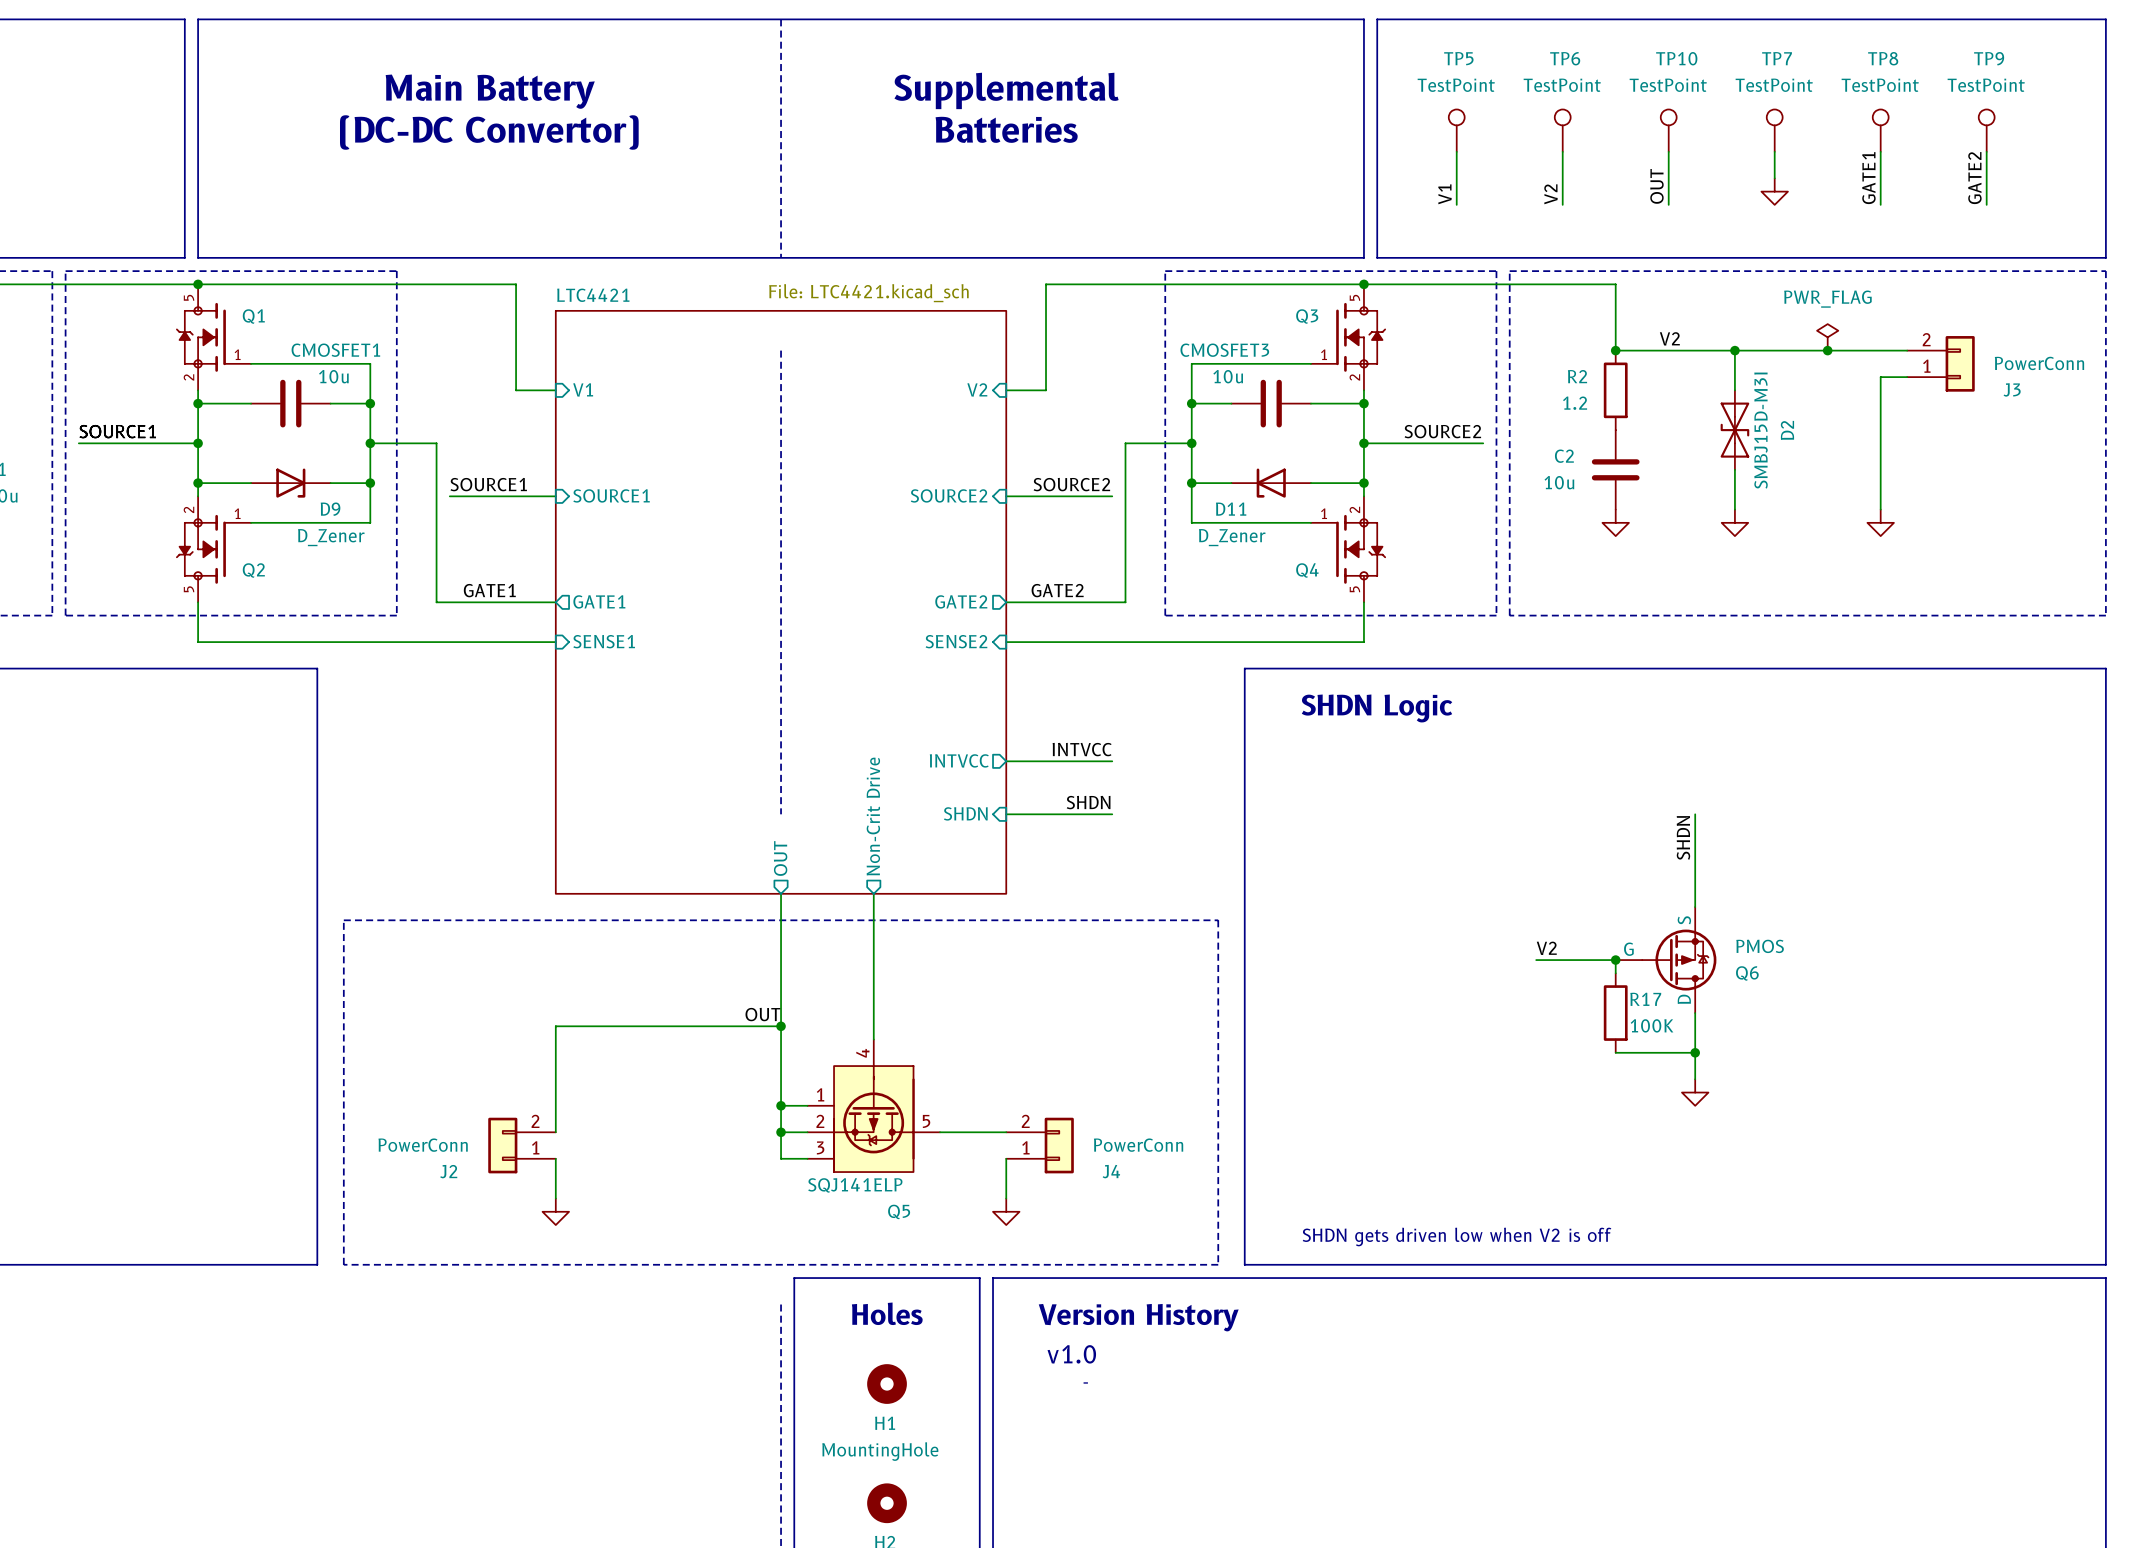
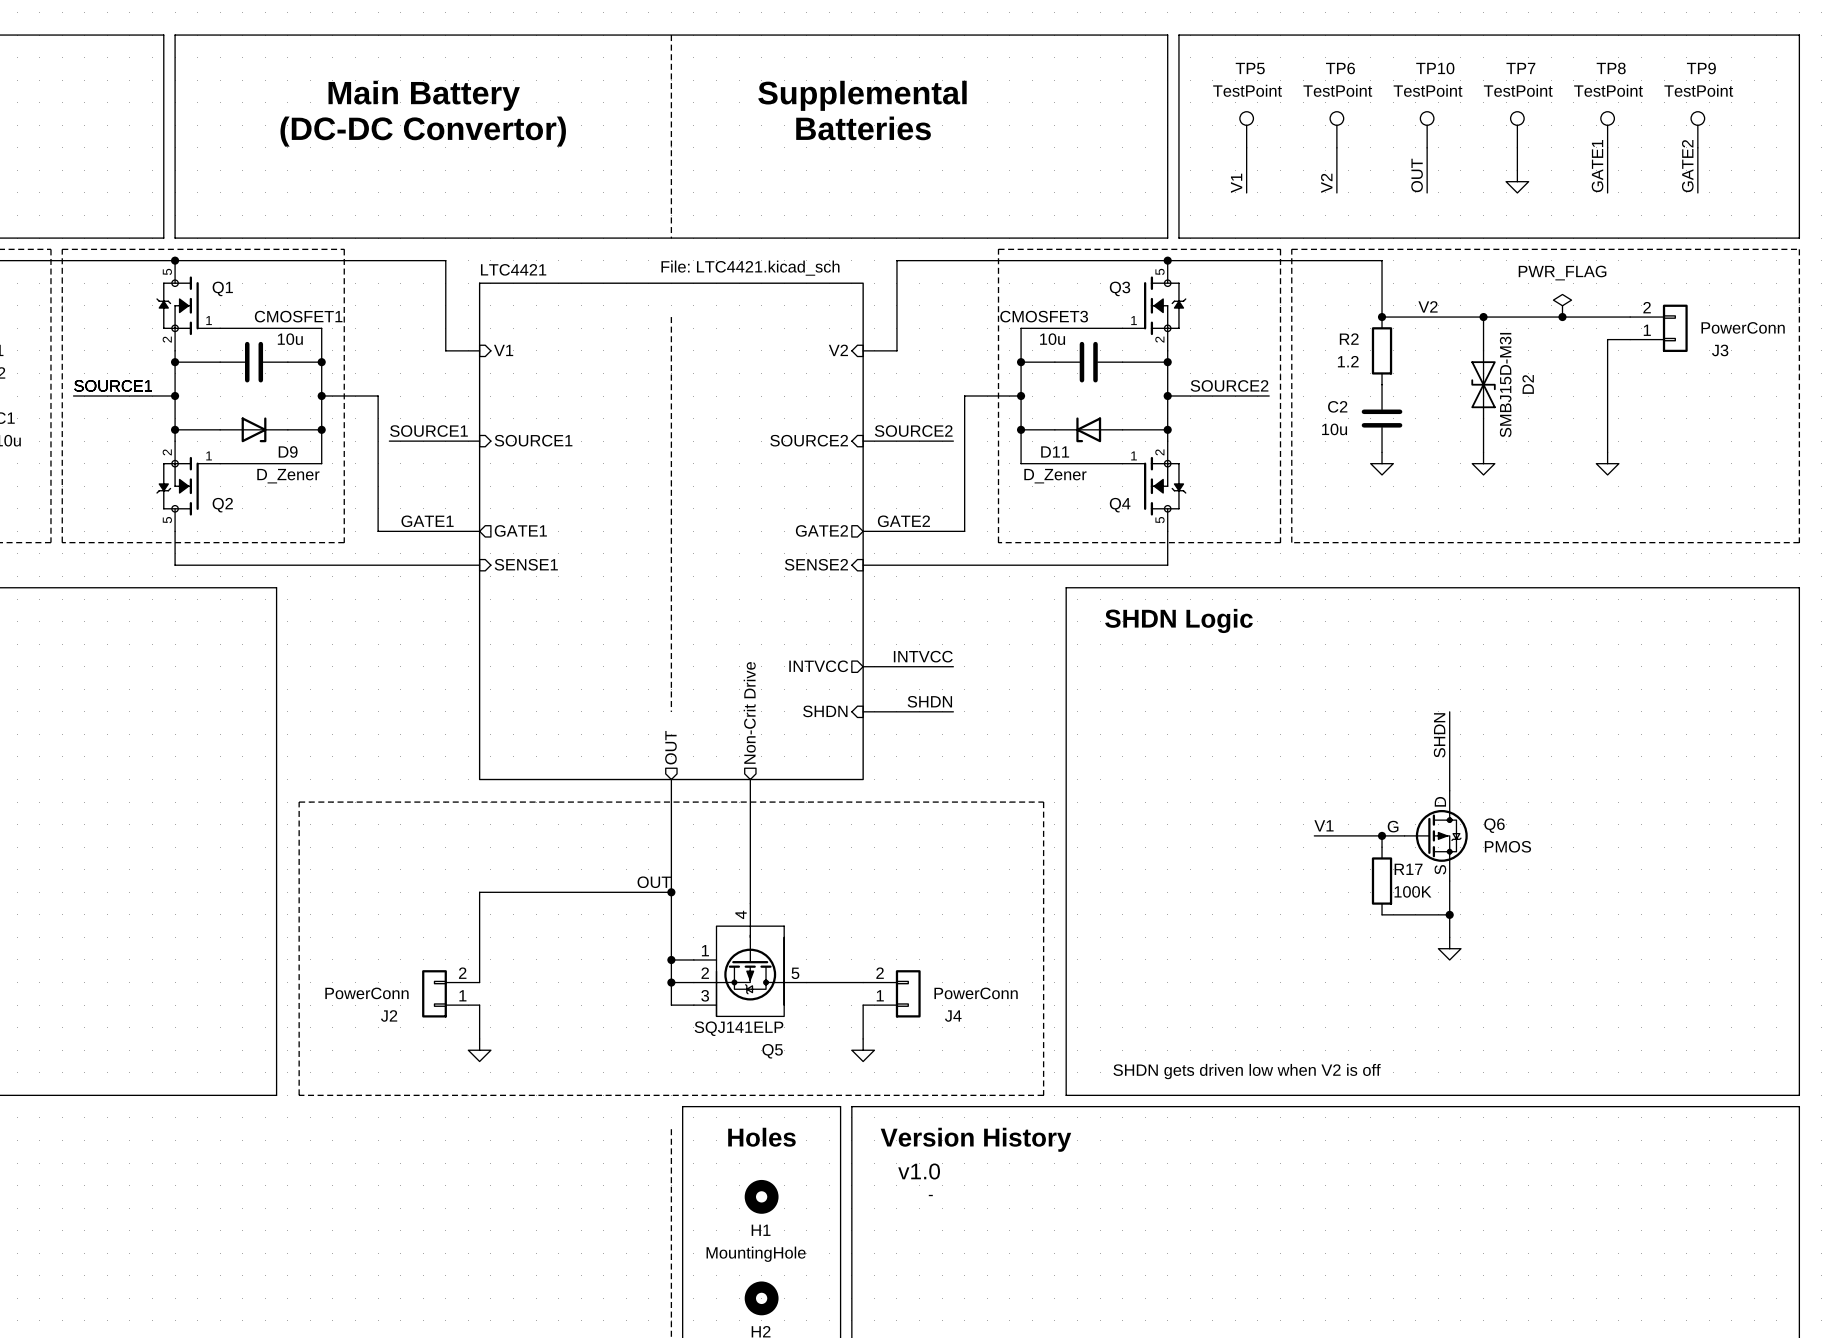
label: V2 (1546, 948) -> V1 (1323, 825)
Q6 flip: as is (1679, 960) -> up-down (1436, 835)

